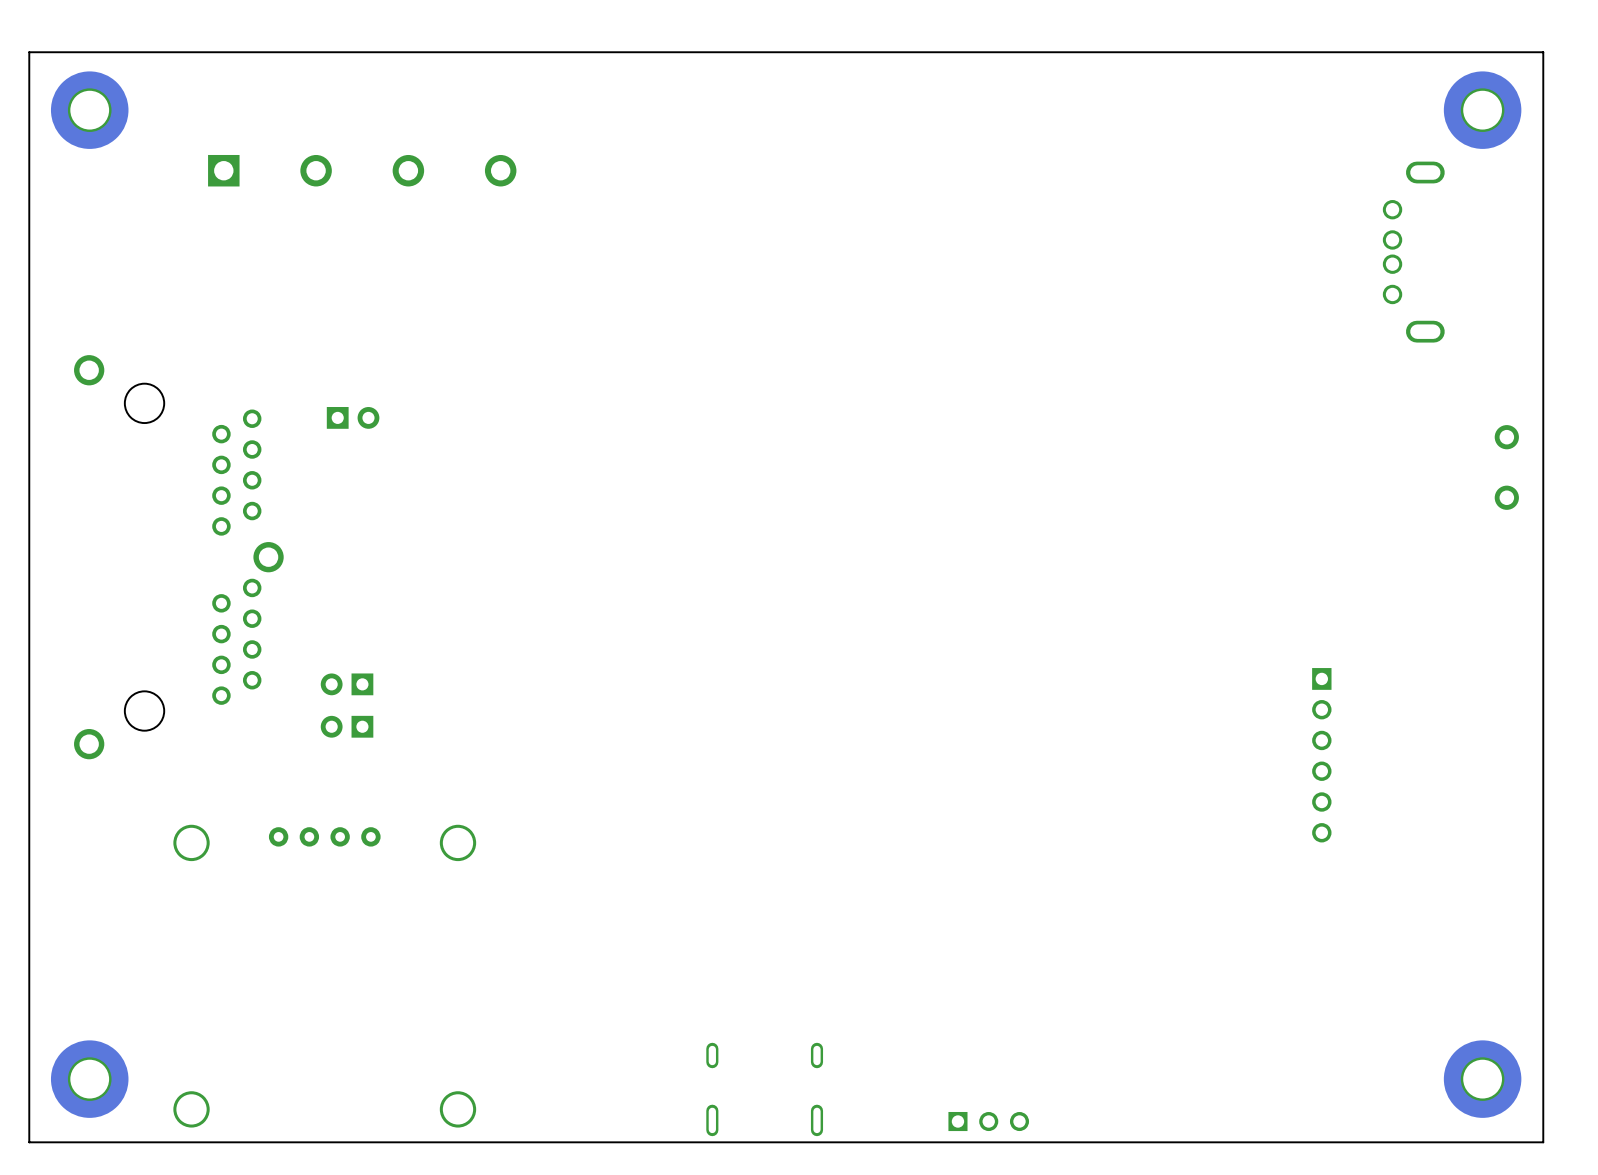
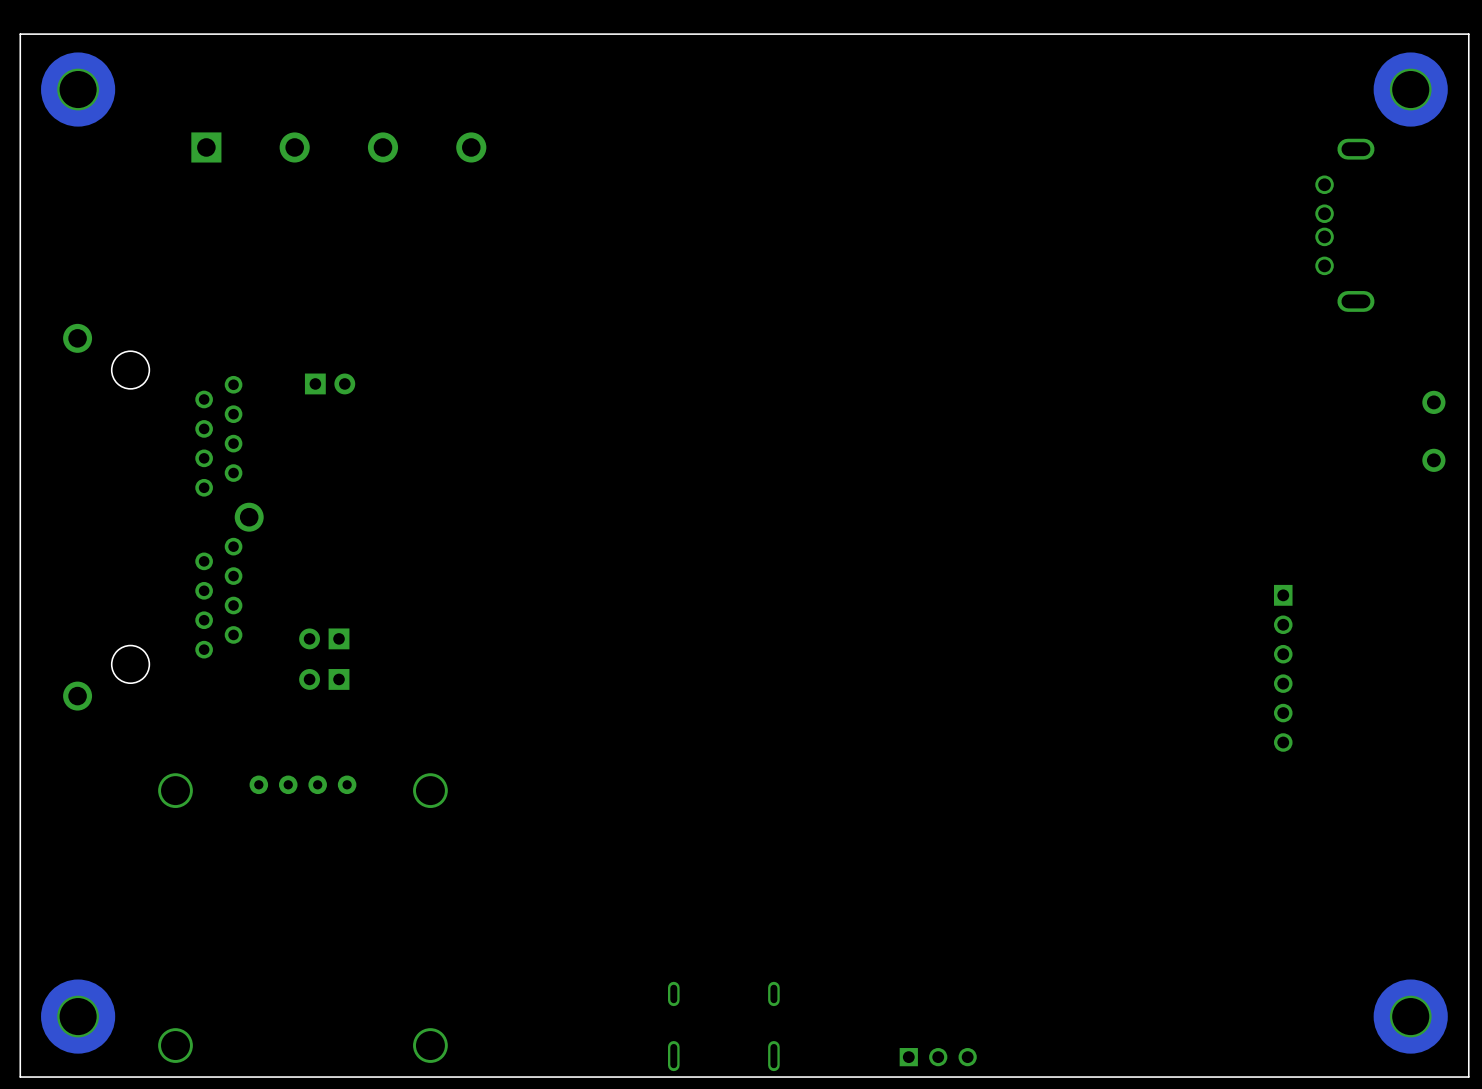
part position: (1321, 755) -> (1283, 668)

